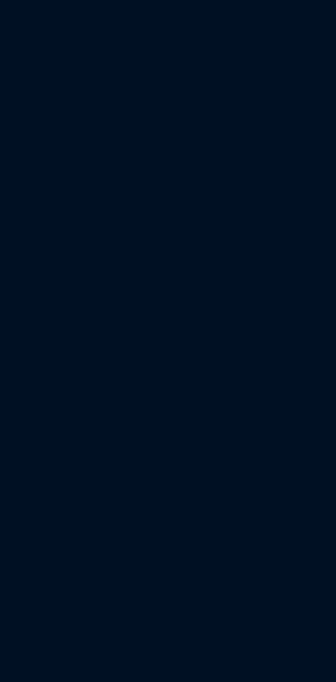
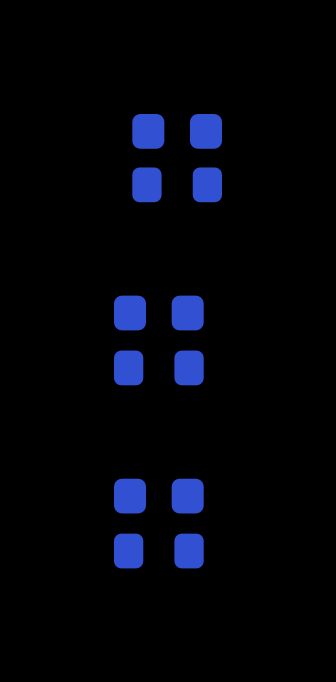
part: none -> (177, 131)
part: none -> (177, 184)
part: none -> (158, 313)
part: none -> (158, 367)
part: none -> (158, 496)
part: none -> (158, 551)

